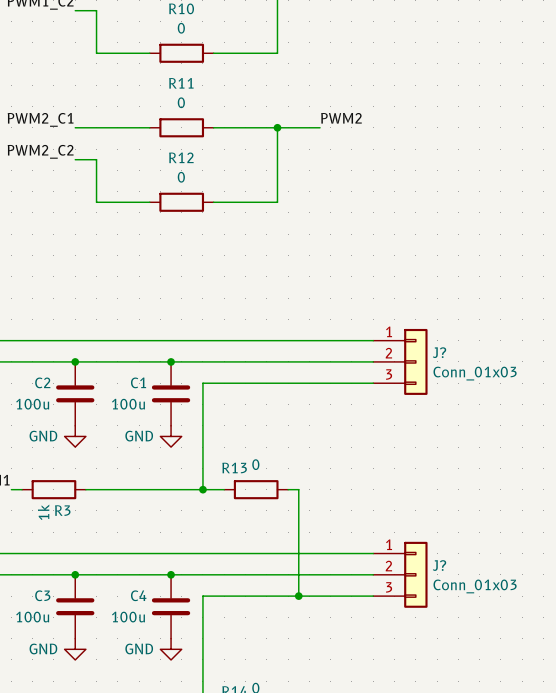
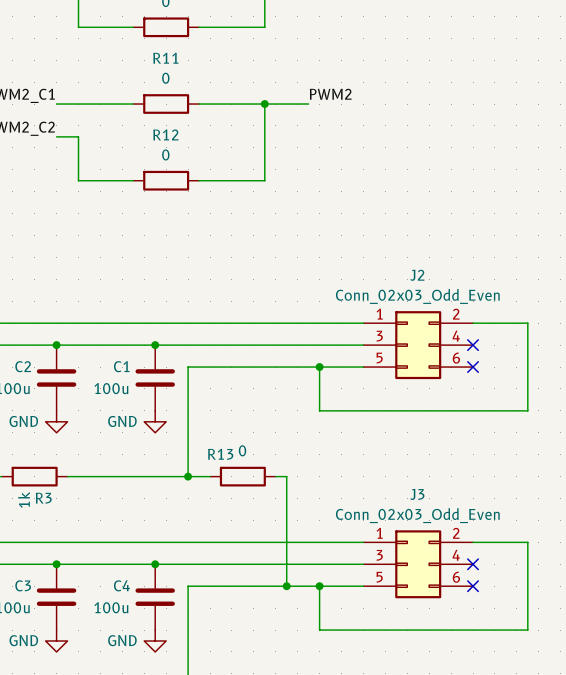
wire: none -> (473, 323) (527, 323) (527, 410) (319, 410) (319, 367)
J?: Conn_01x03 (400, 361) -> none
J2: none -> Conn_02x03_Odd_Even (418, 345)
no-connect mark: none -> (473, 345)
junction: none -> (319, 367)
no-connect mark: none -> (473, 367)
wire: none -> (473, 542) (527, 542) (527, 630) (319, 630) (319, 586)
J?: Conn_01x03 (400, 574) -> none
J3: none -> Conn_02x03_Odd_Even (418, 564)
no-connect mark: none -> (473, 564)
junction: none -> (319, 586)
no-connect mark: none -> (473, 586)

